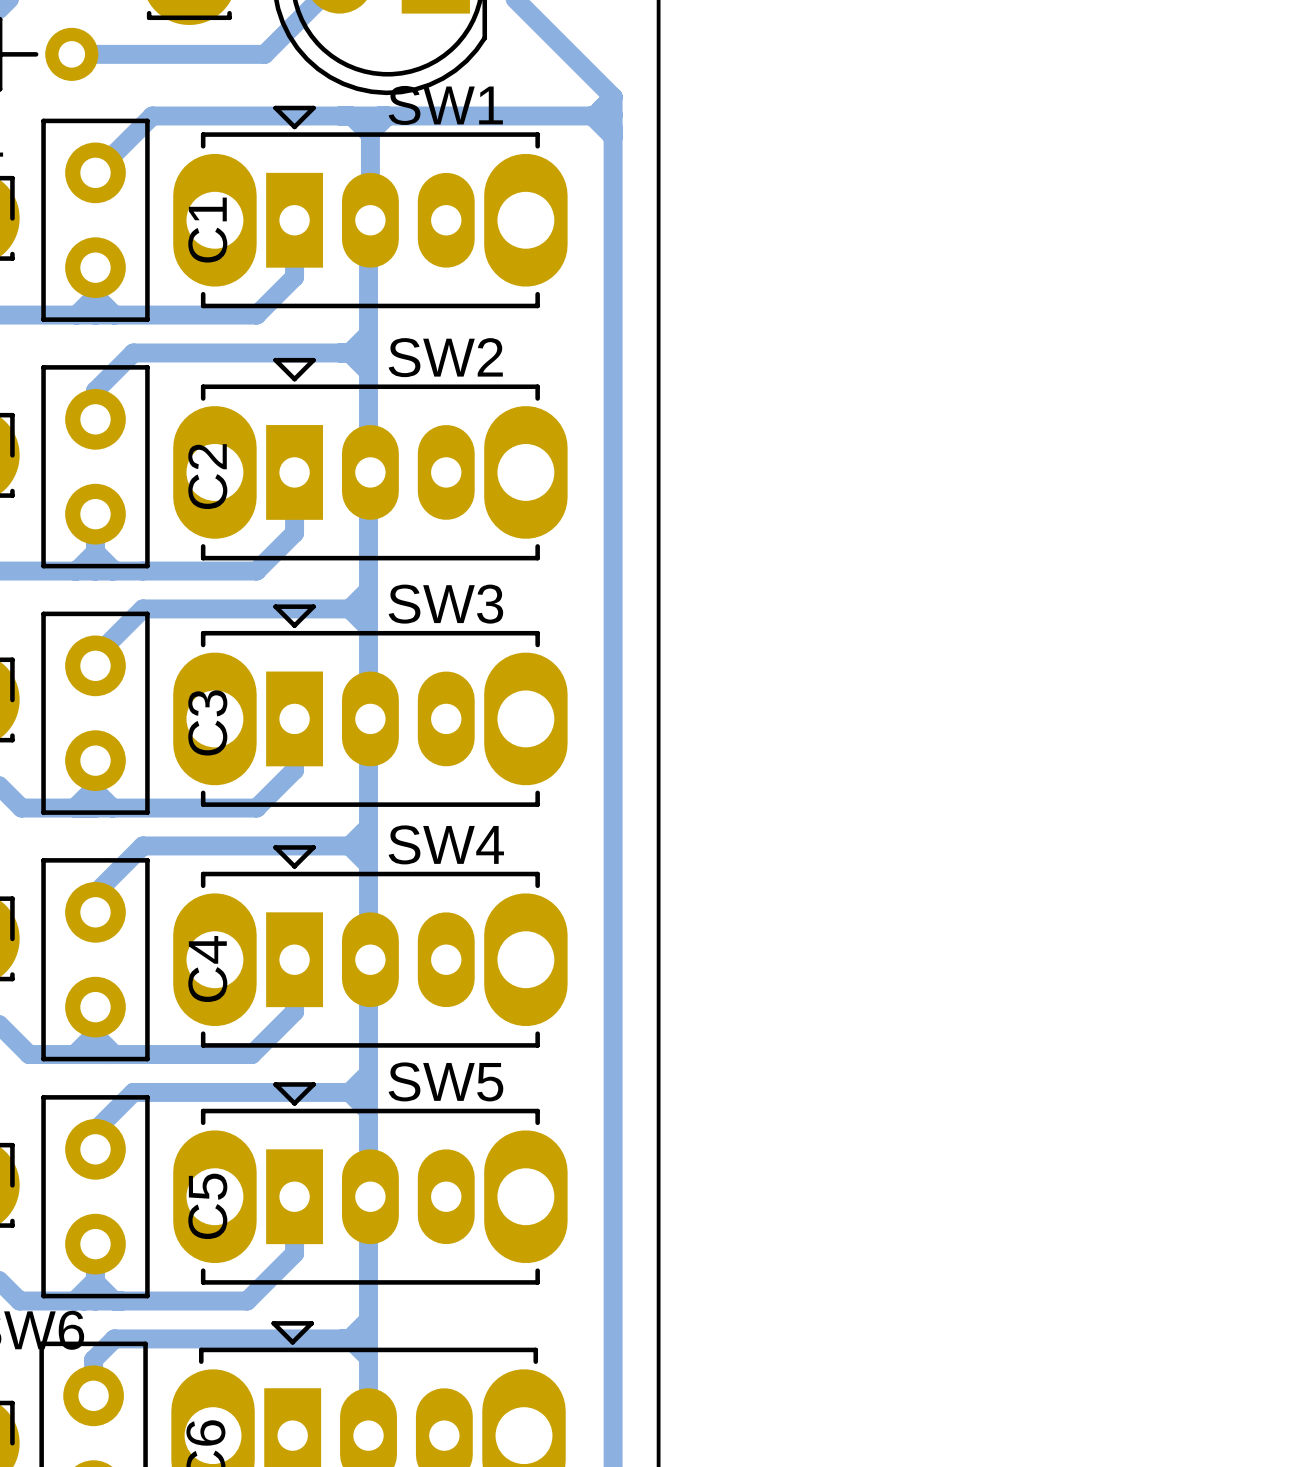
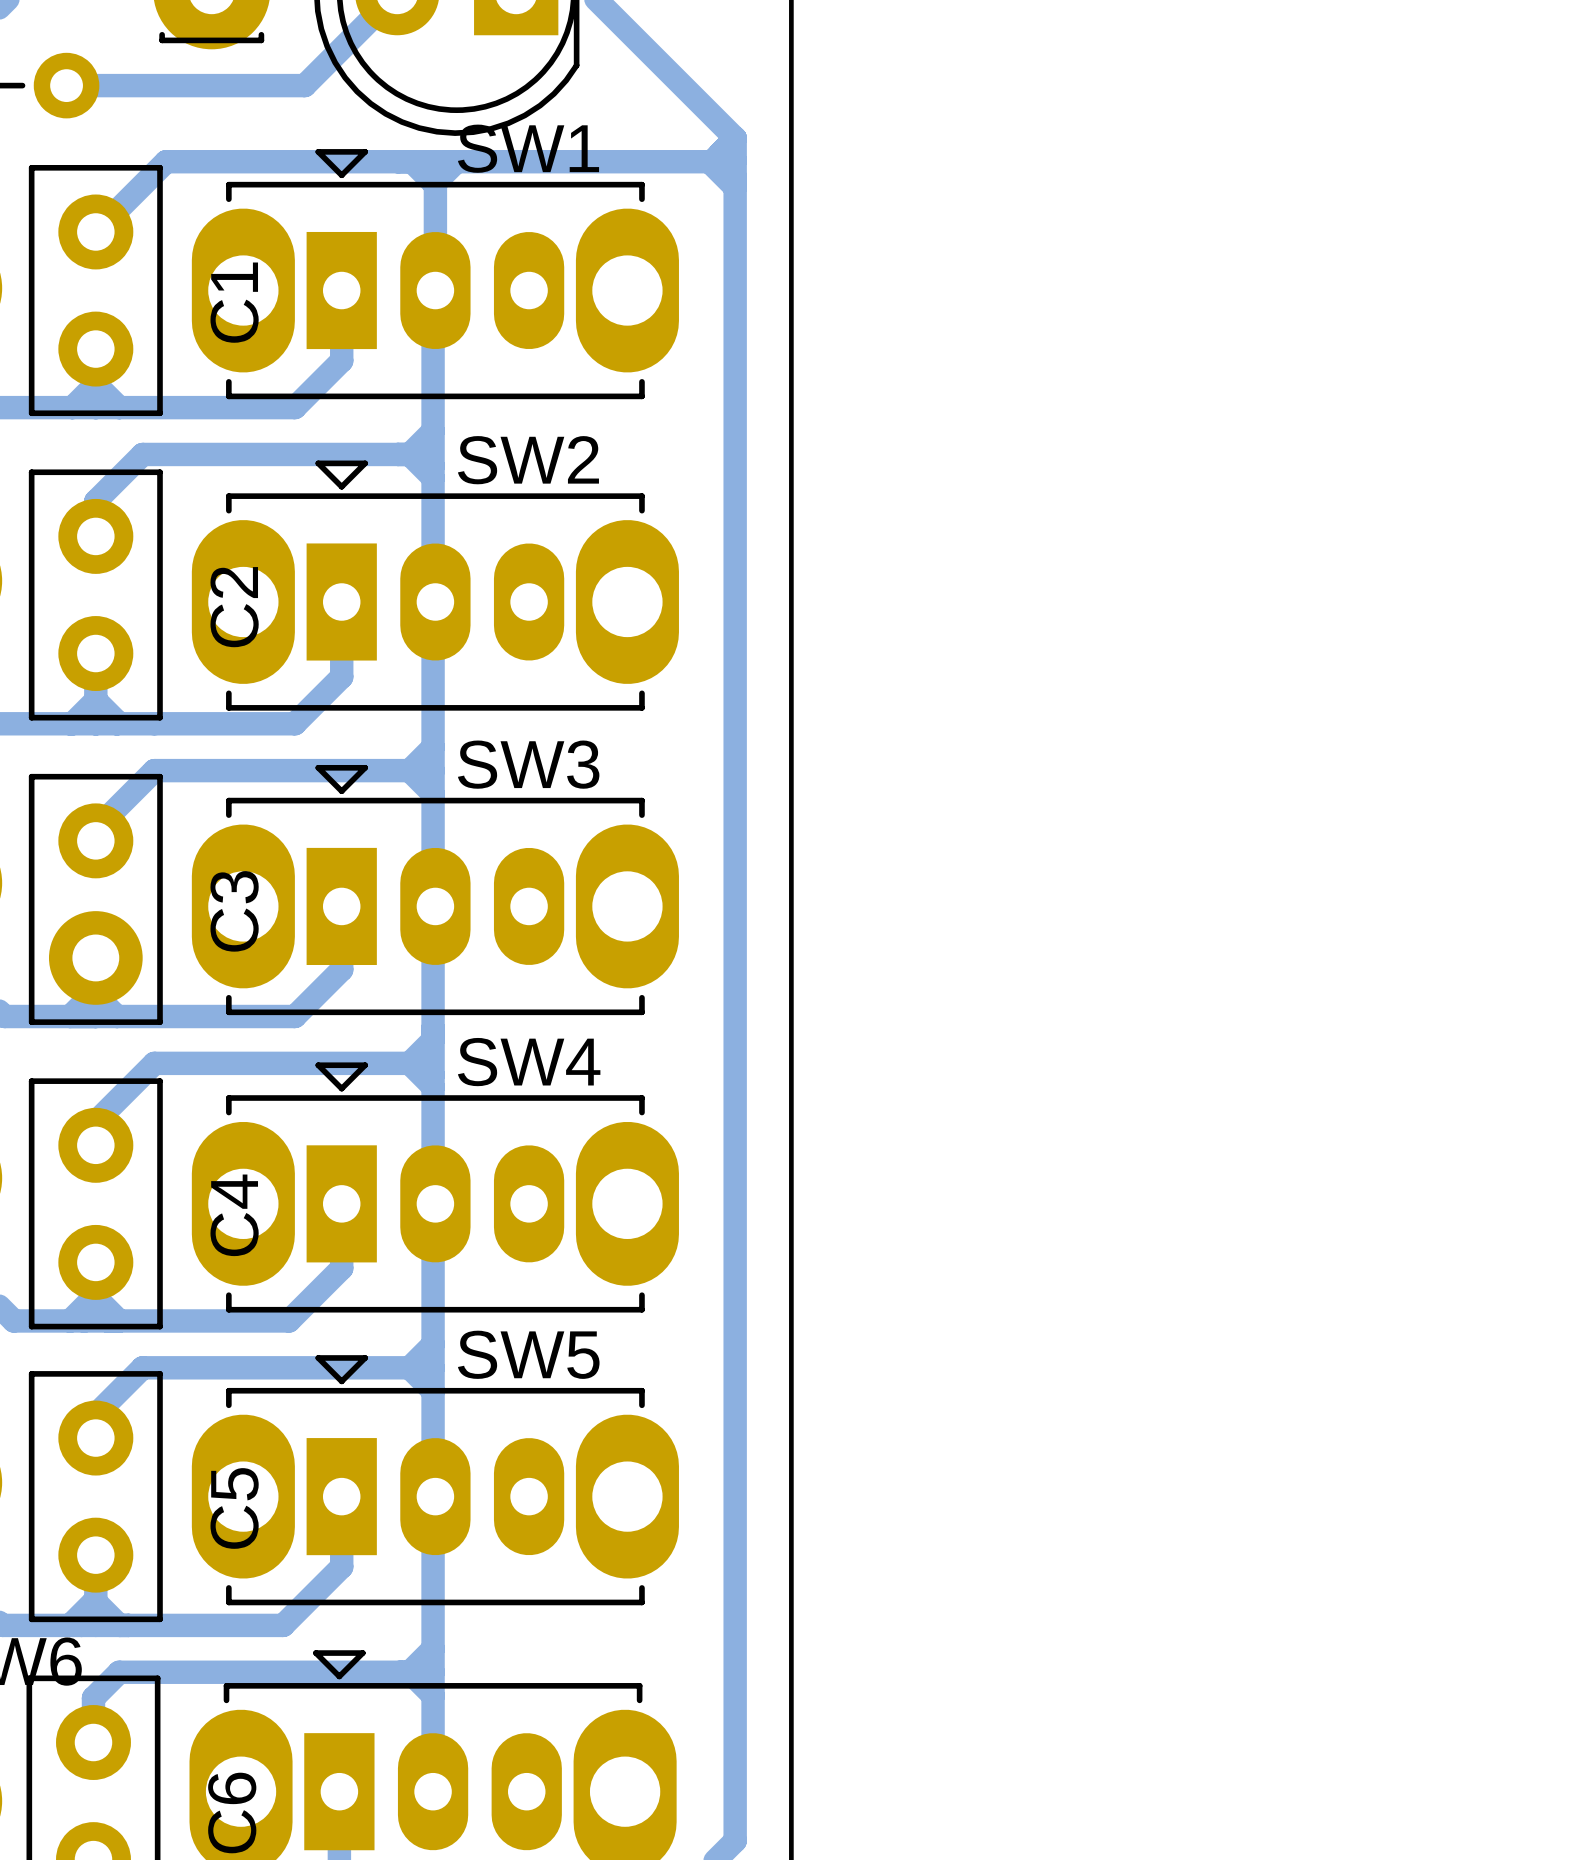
C3 footprint: [41, 611, 150, 815] -> [28, 773, 163, 1025]

